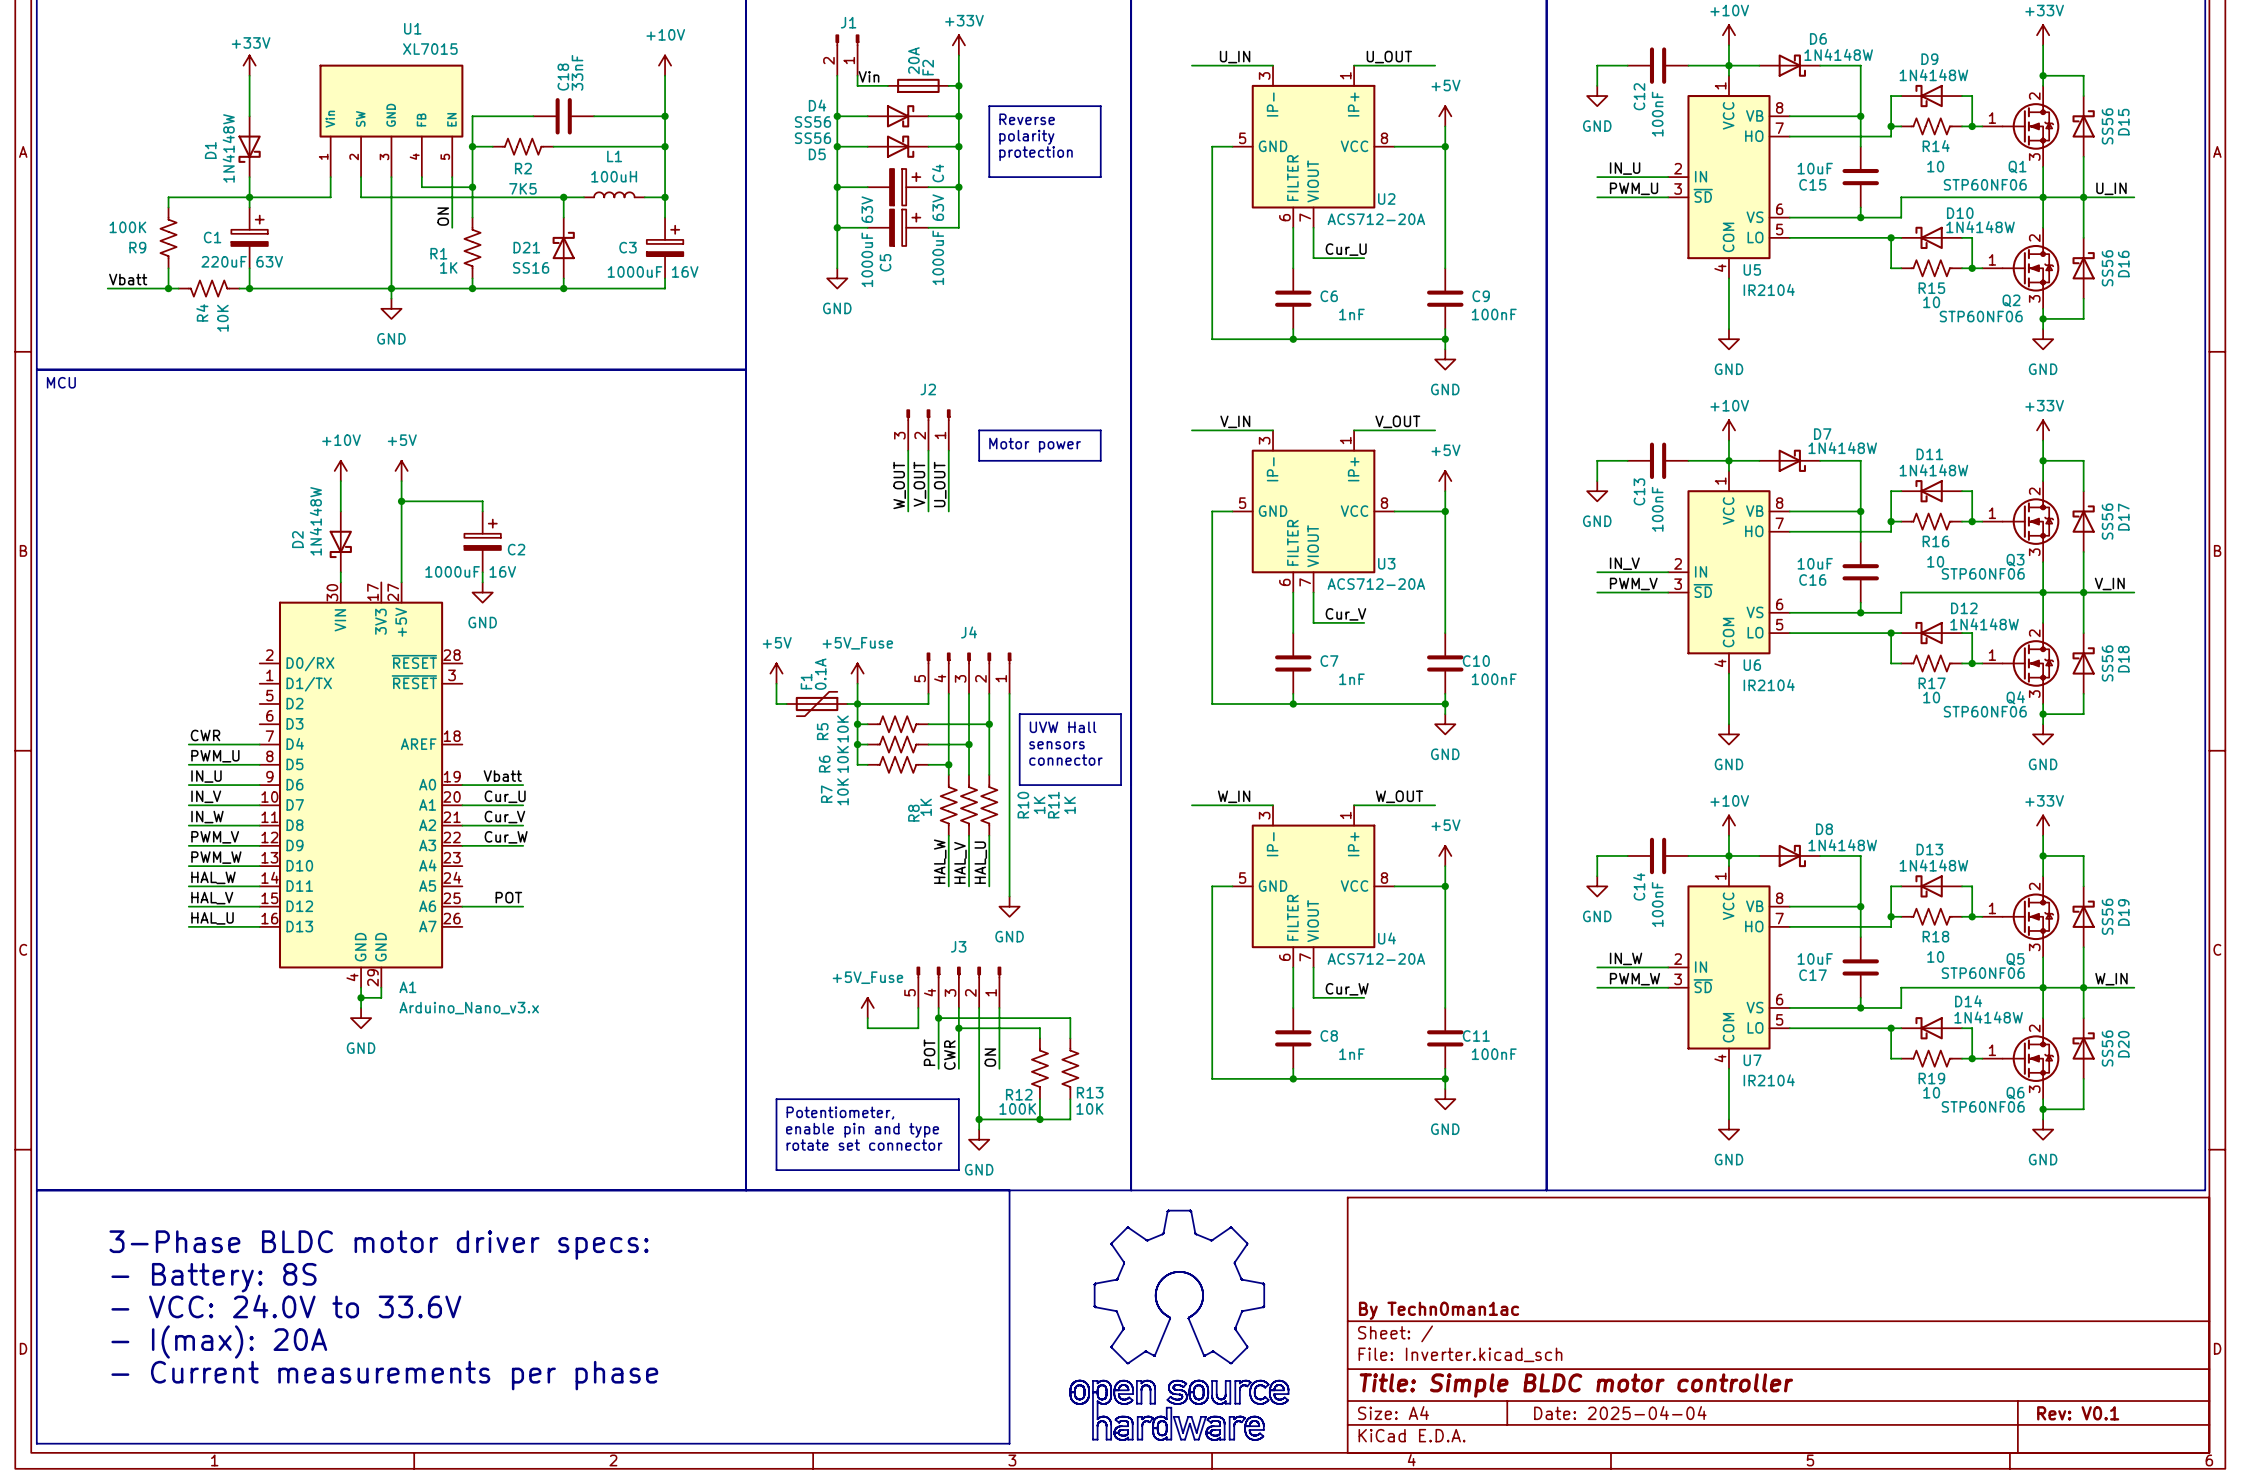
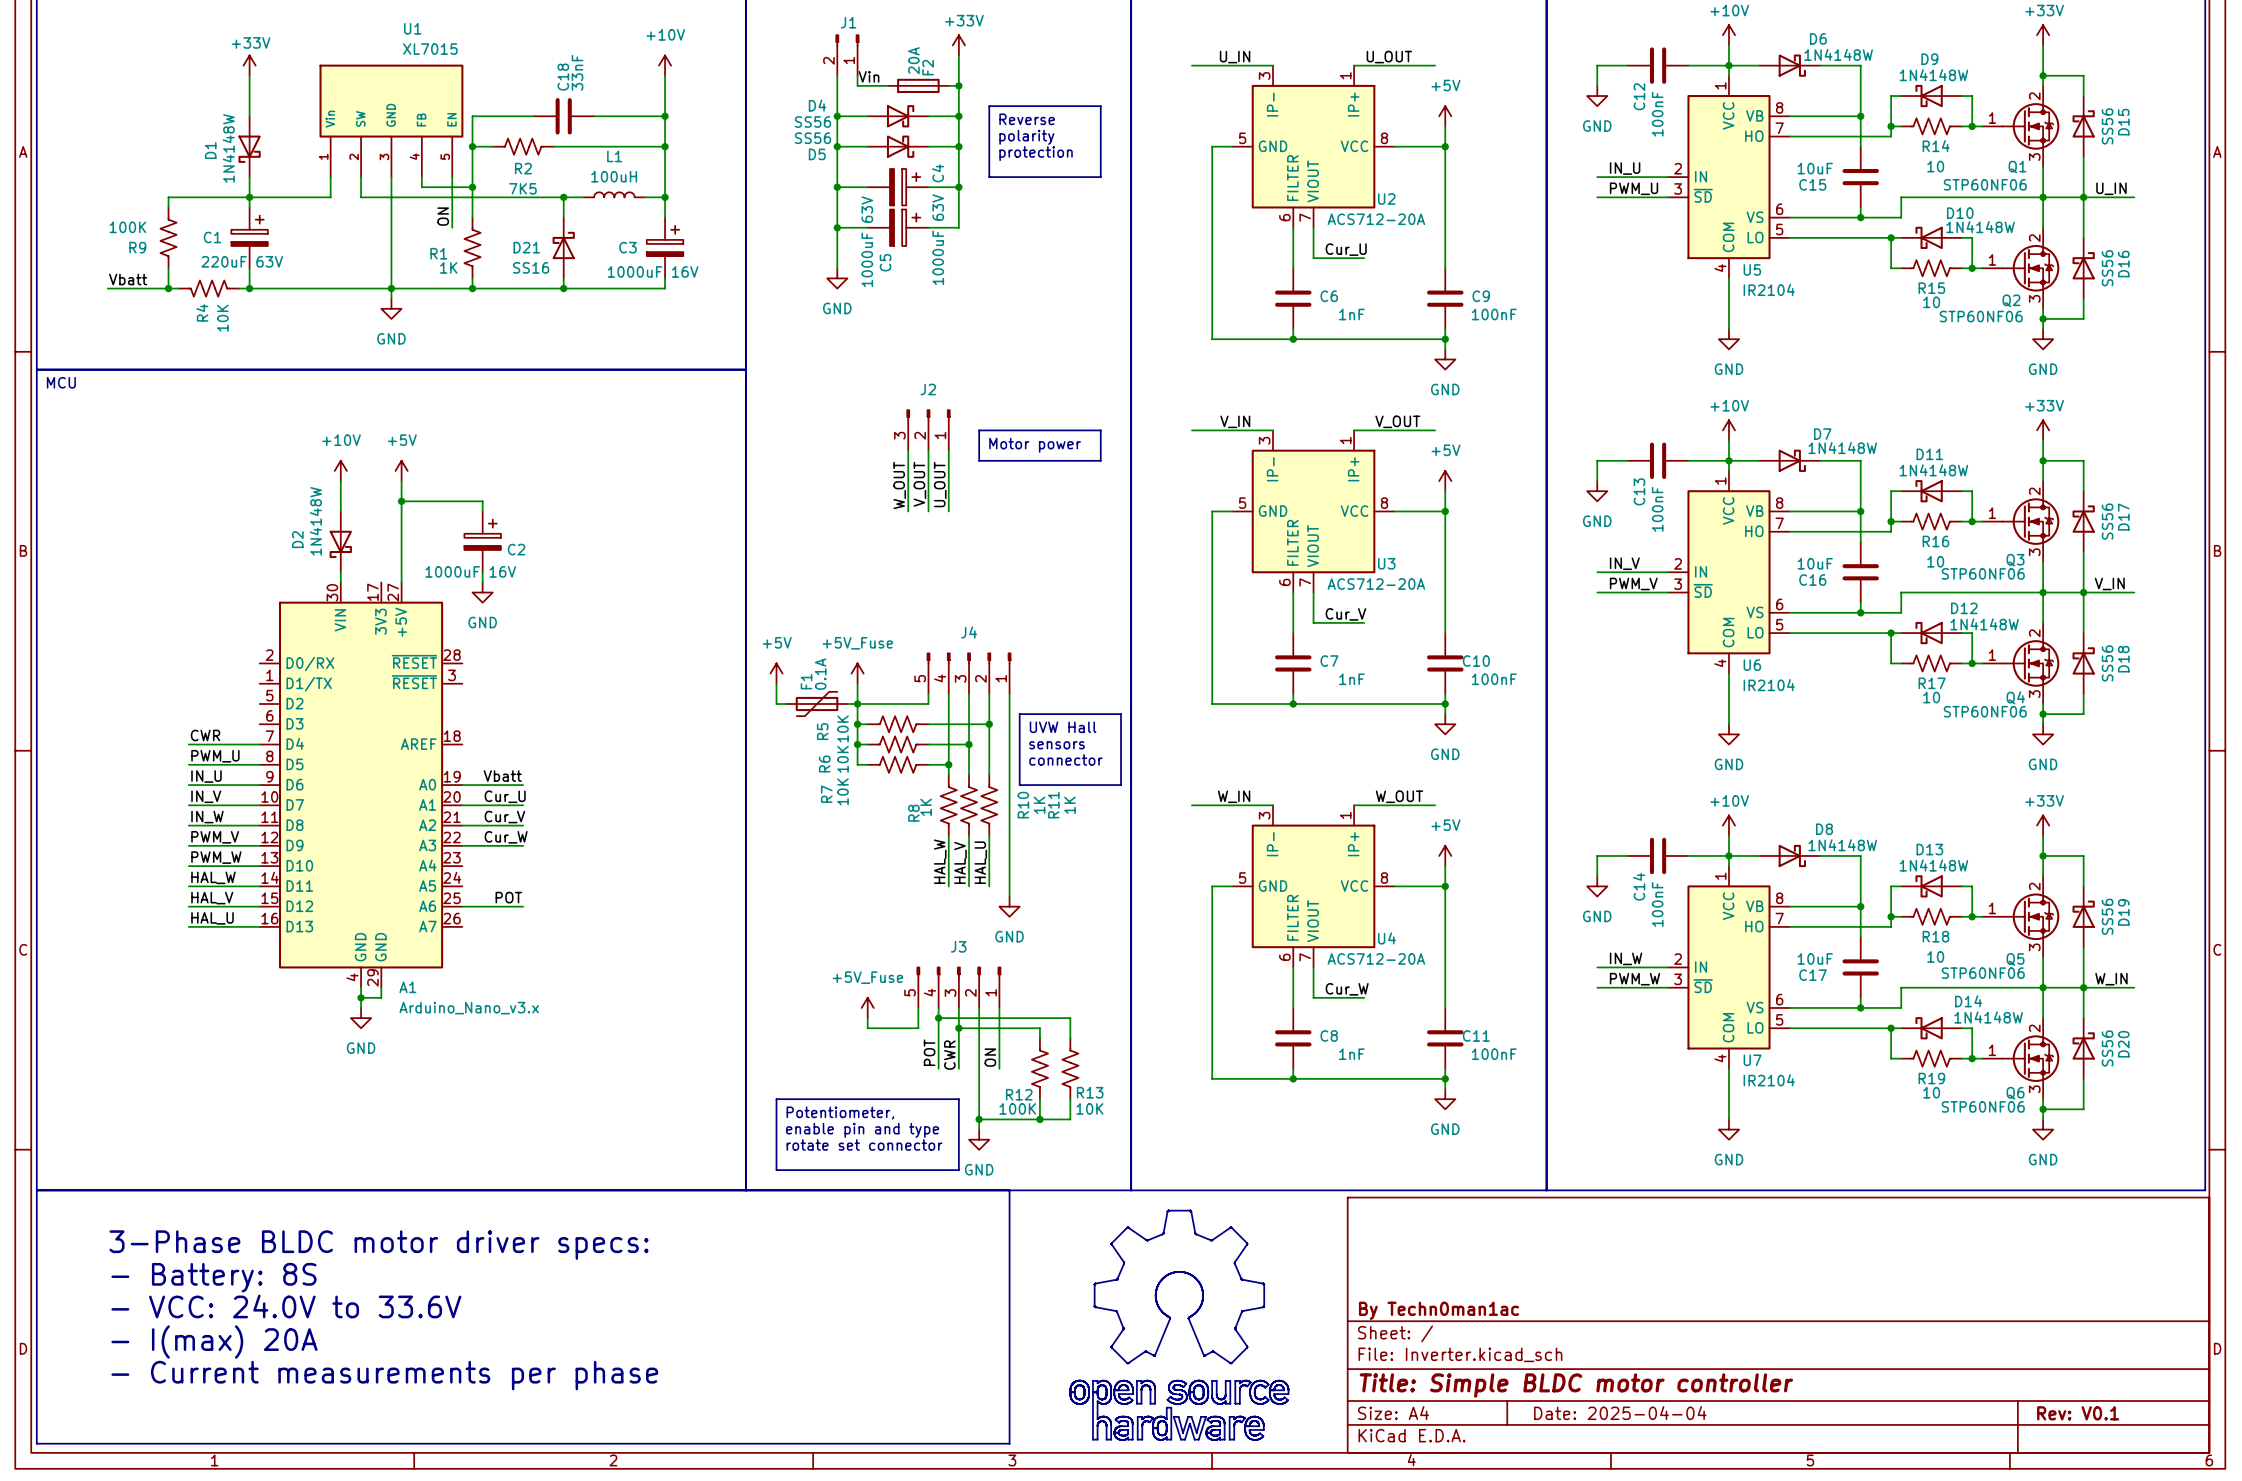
text: - I(max): 20A (219, 1341) -> - I(max) 20A (214, 1341)

